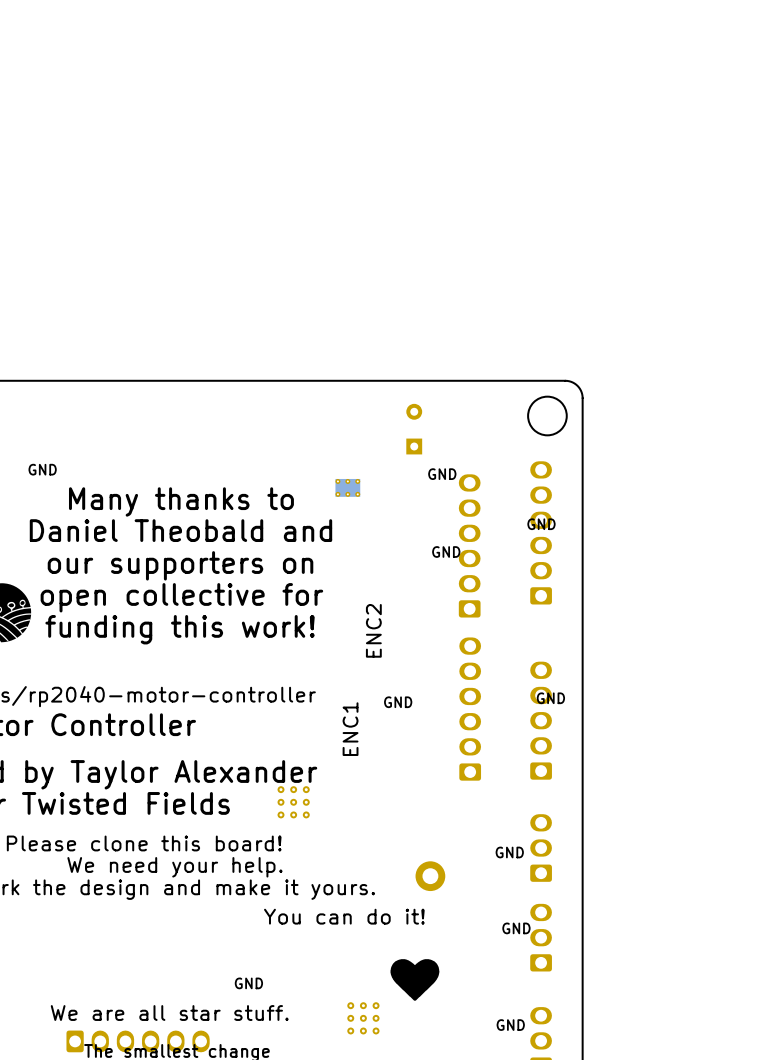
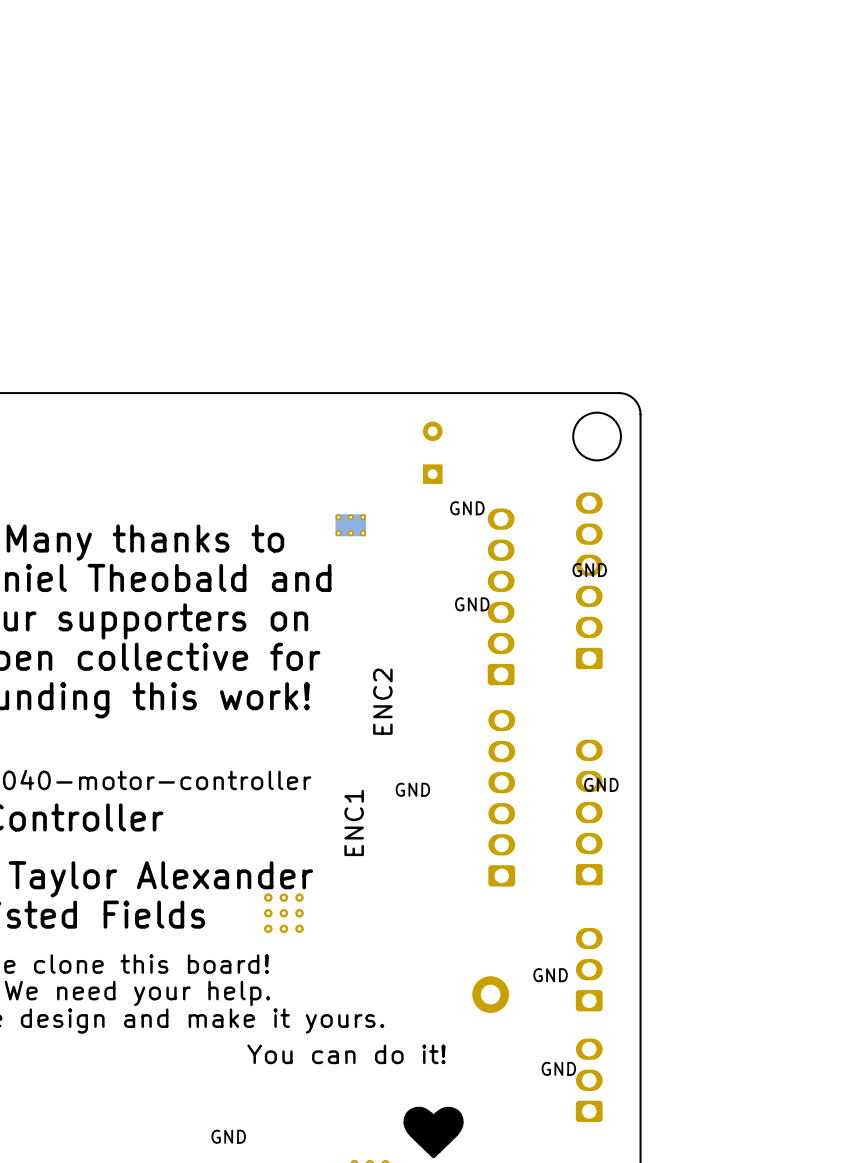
part position: (430, 876) -> (490, 994)

